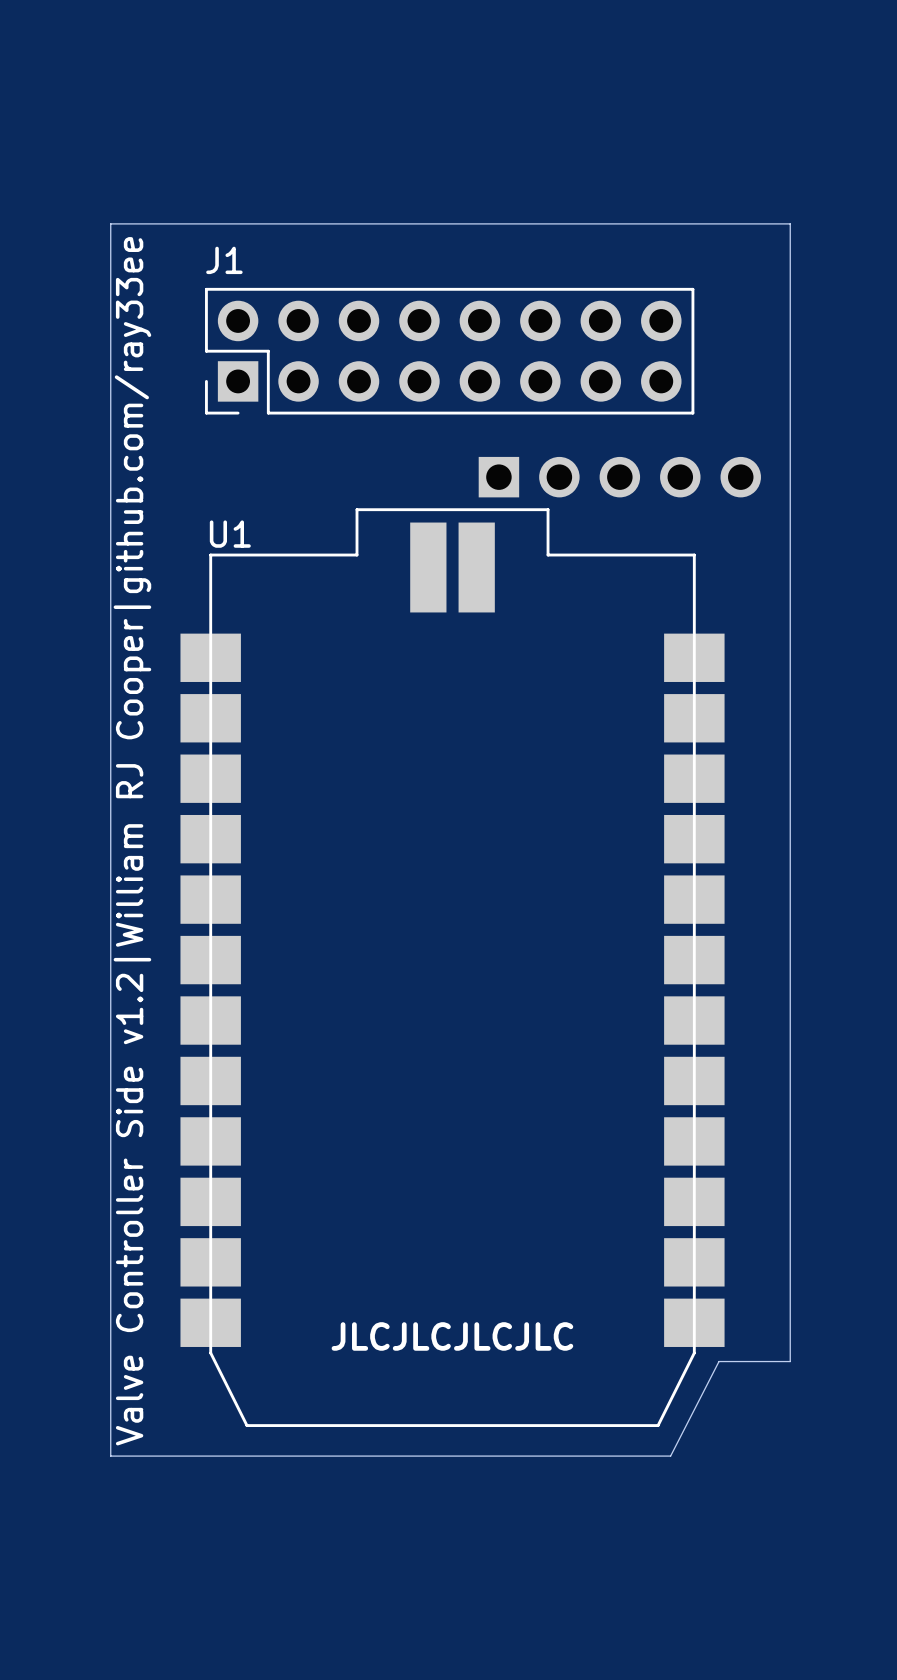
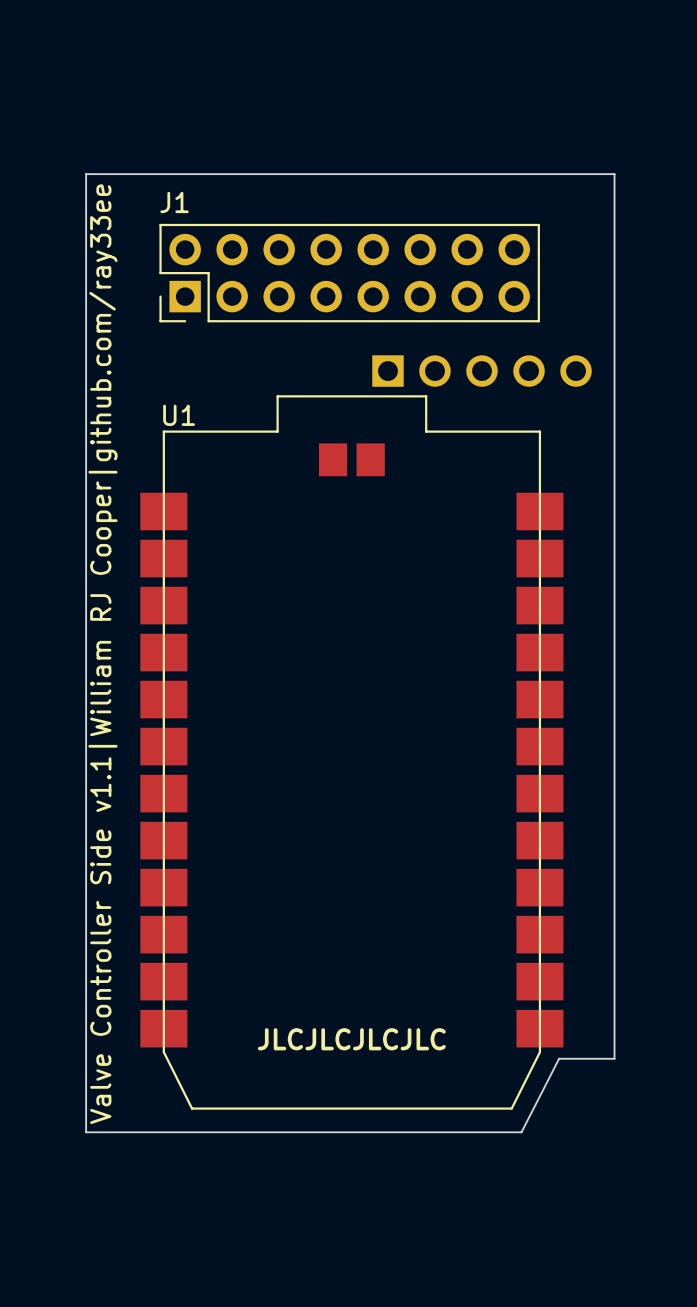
U1 footprint: [180, 508, 725, 1427] -> [140, 395, 564, 1110]
text: Valve Controller Side v1.2|William RJ Cooper|github.com/ray33ee (132, 841) -> Valve Controller Side v1.1|William RJ Cooper|github.com/ray33ee (102, 654)

